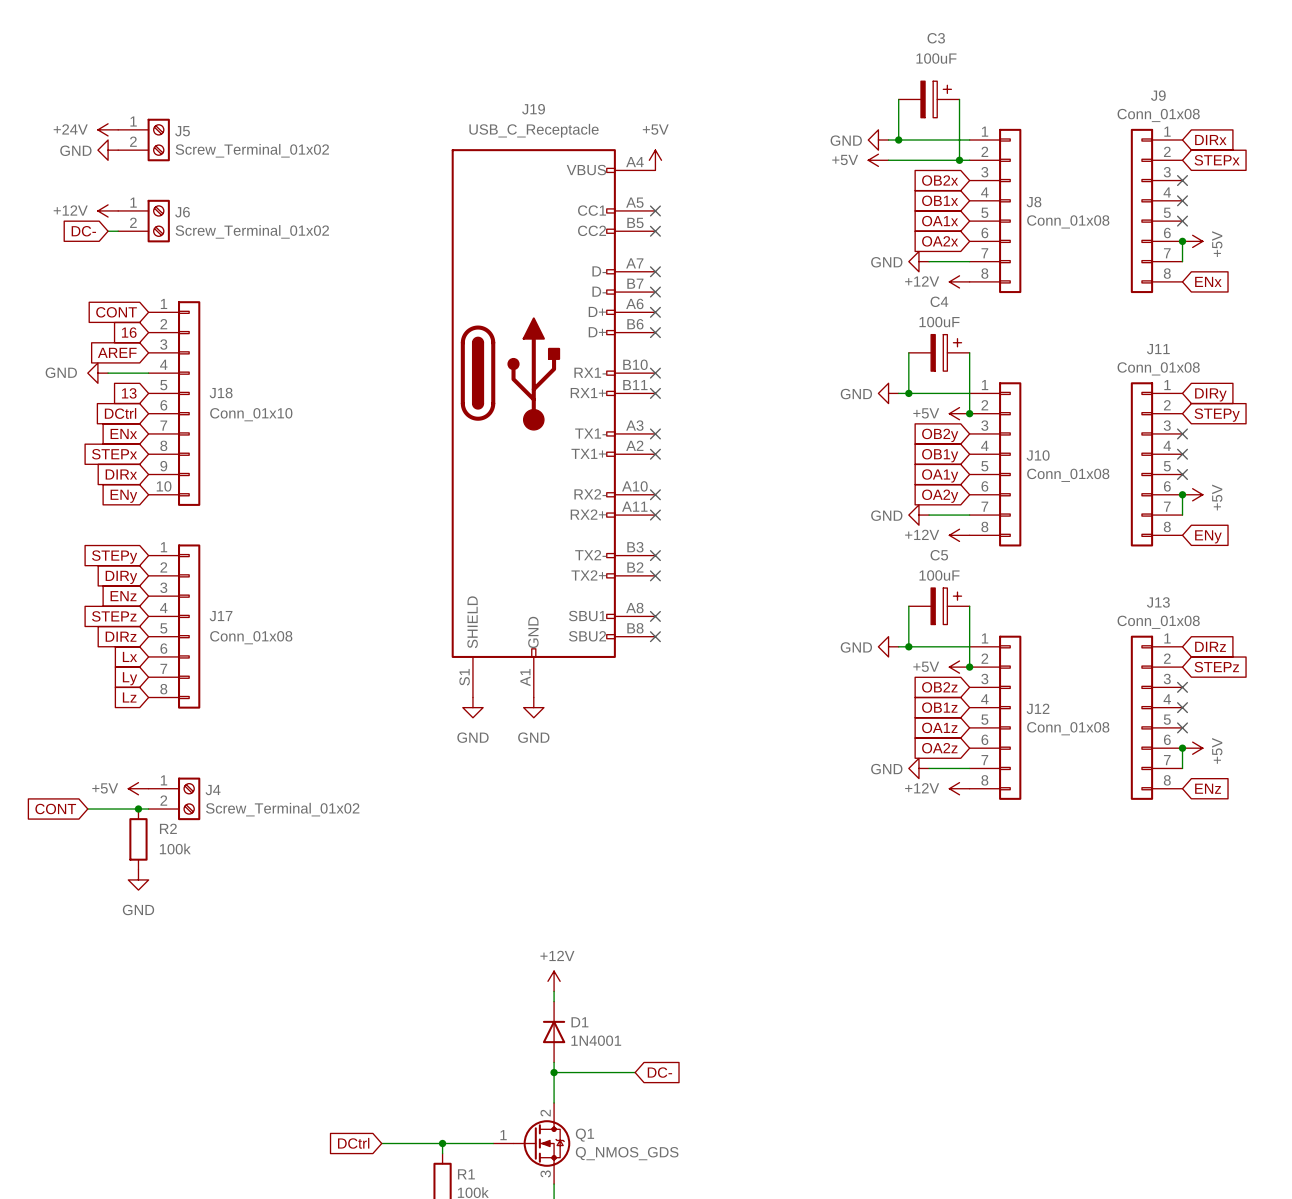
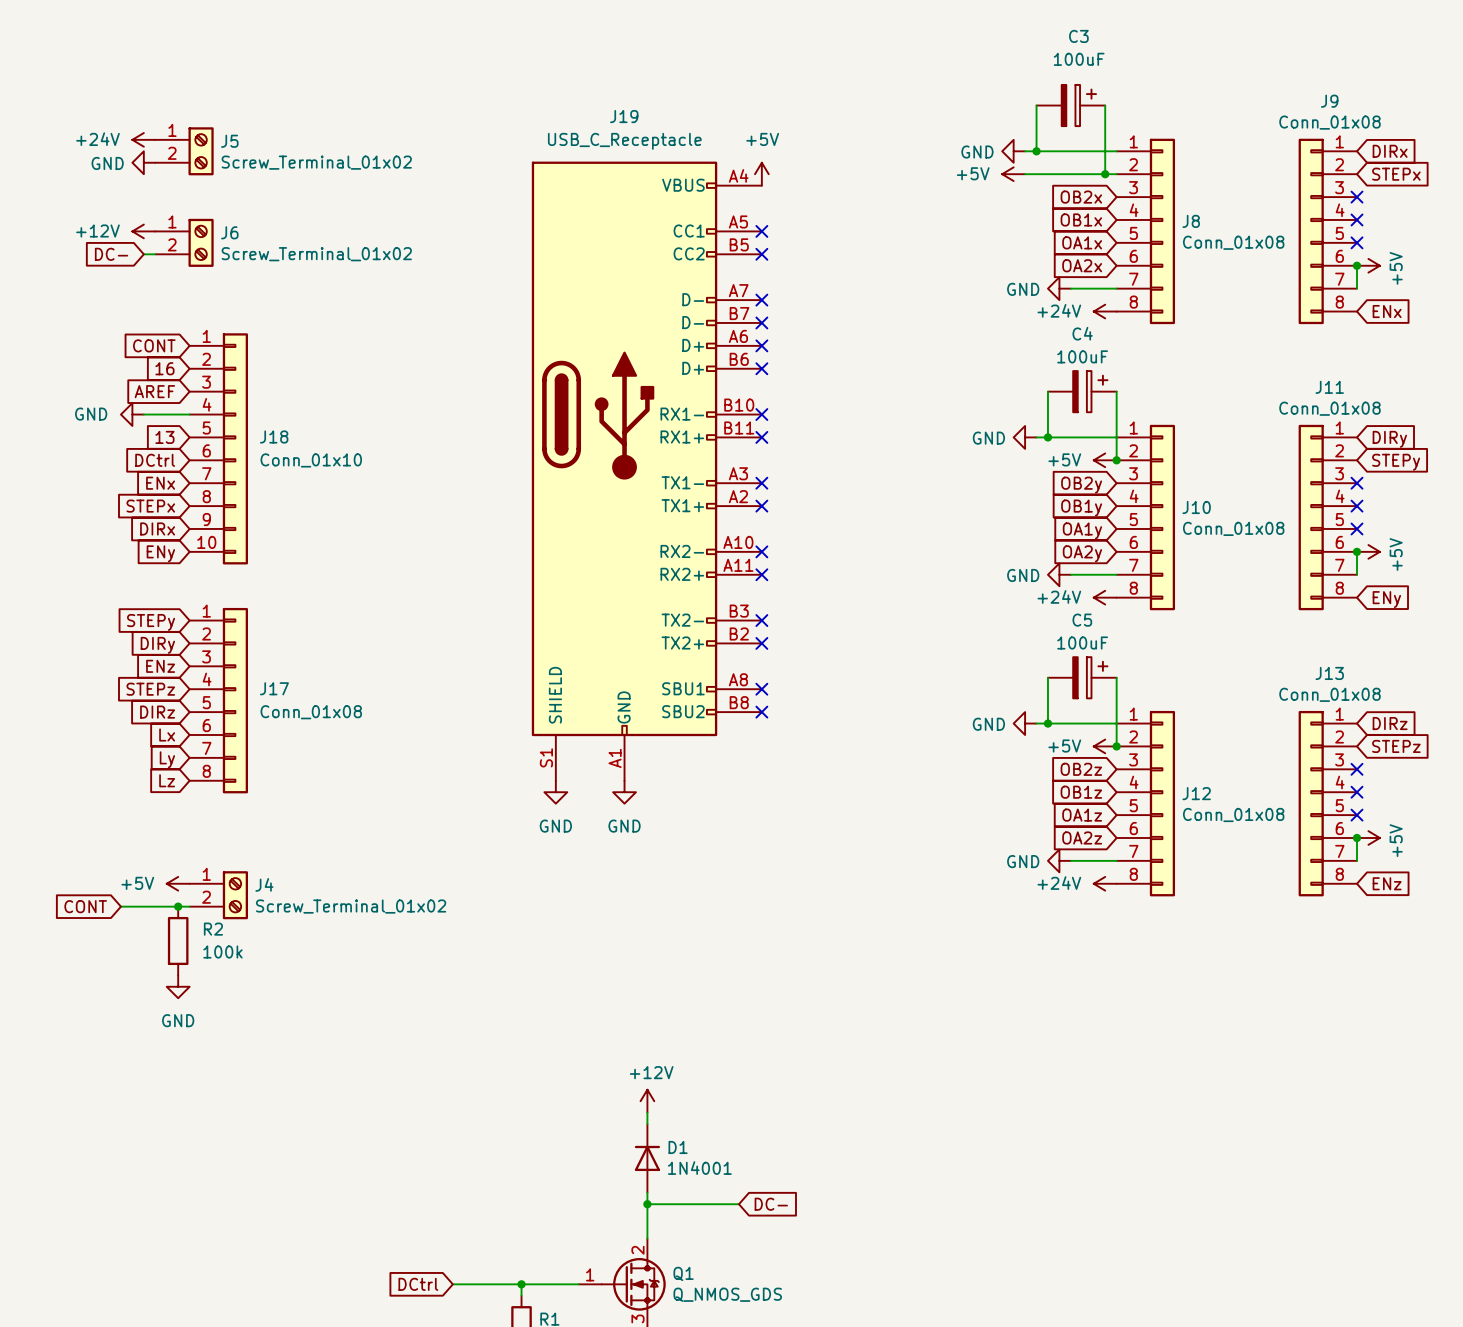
power symbol: +12V (959, 281) -> +24V (1105, 311)
power symbol: +12V (959, 535) -> +24V (1105, 597)
power symbol: +12V (959, 788) -> +24V (1105, 883)

